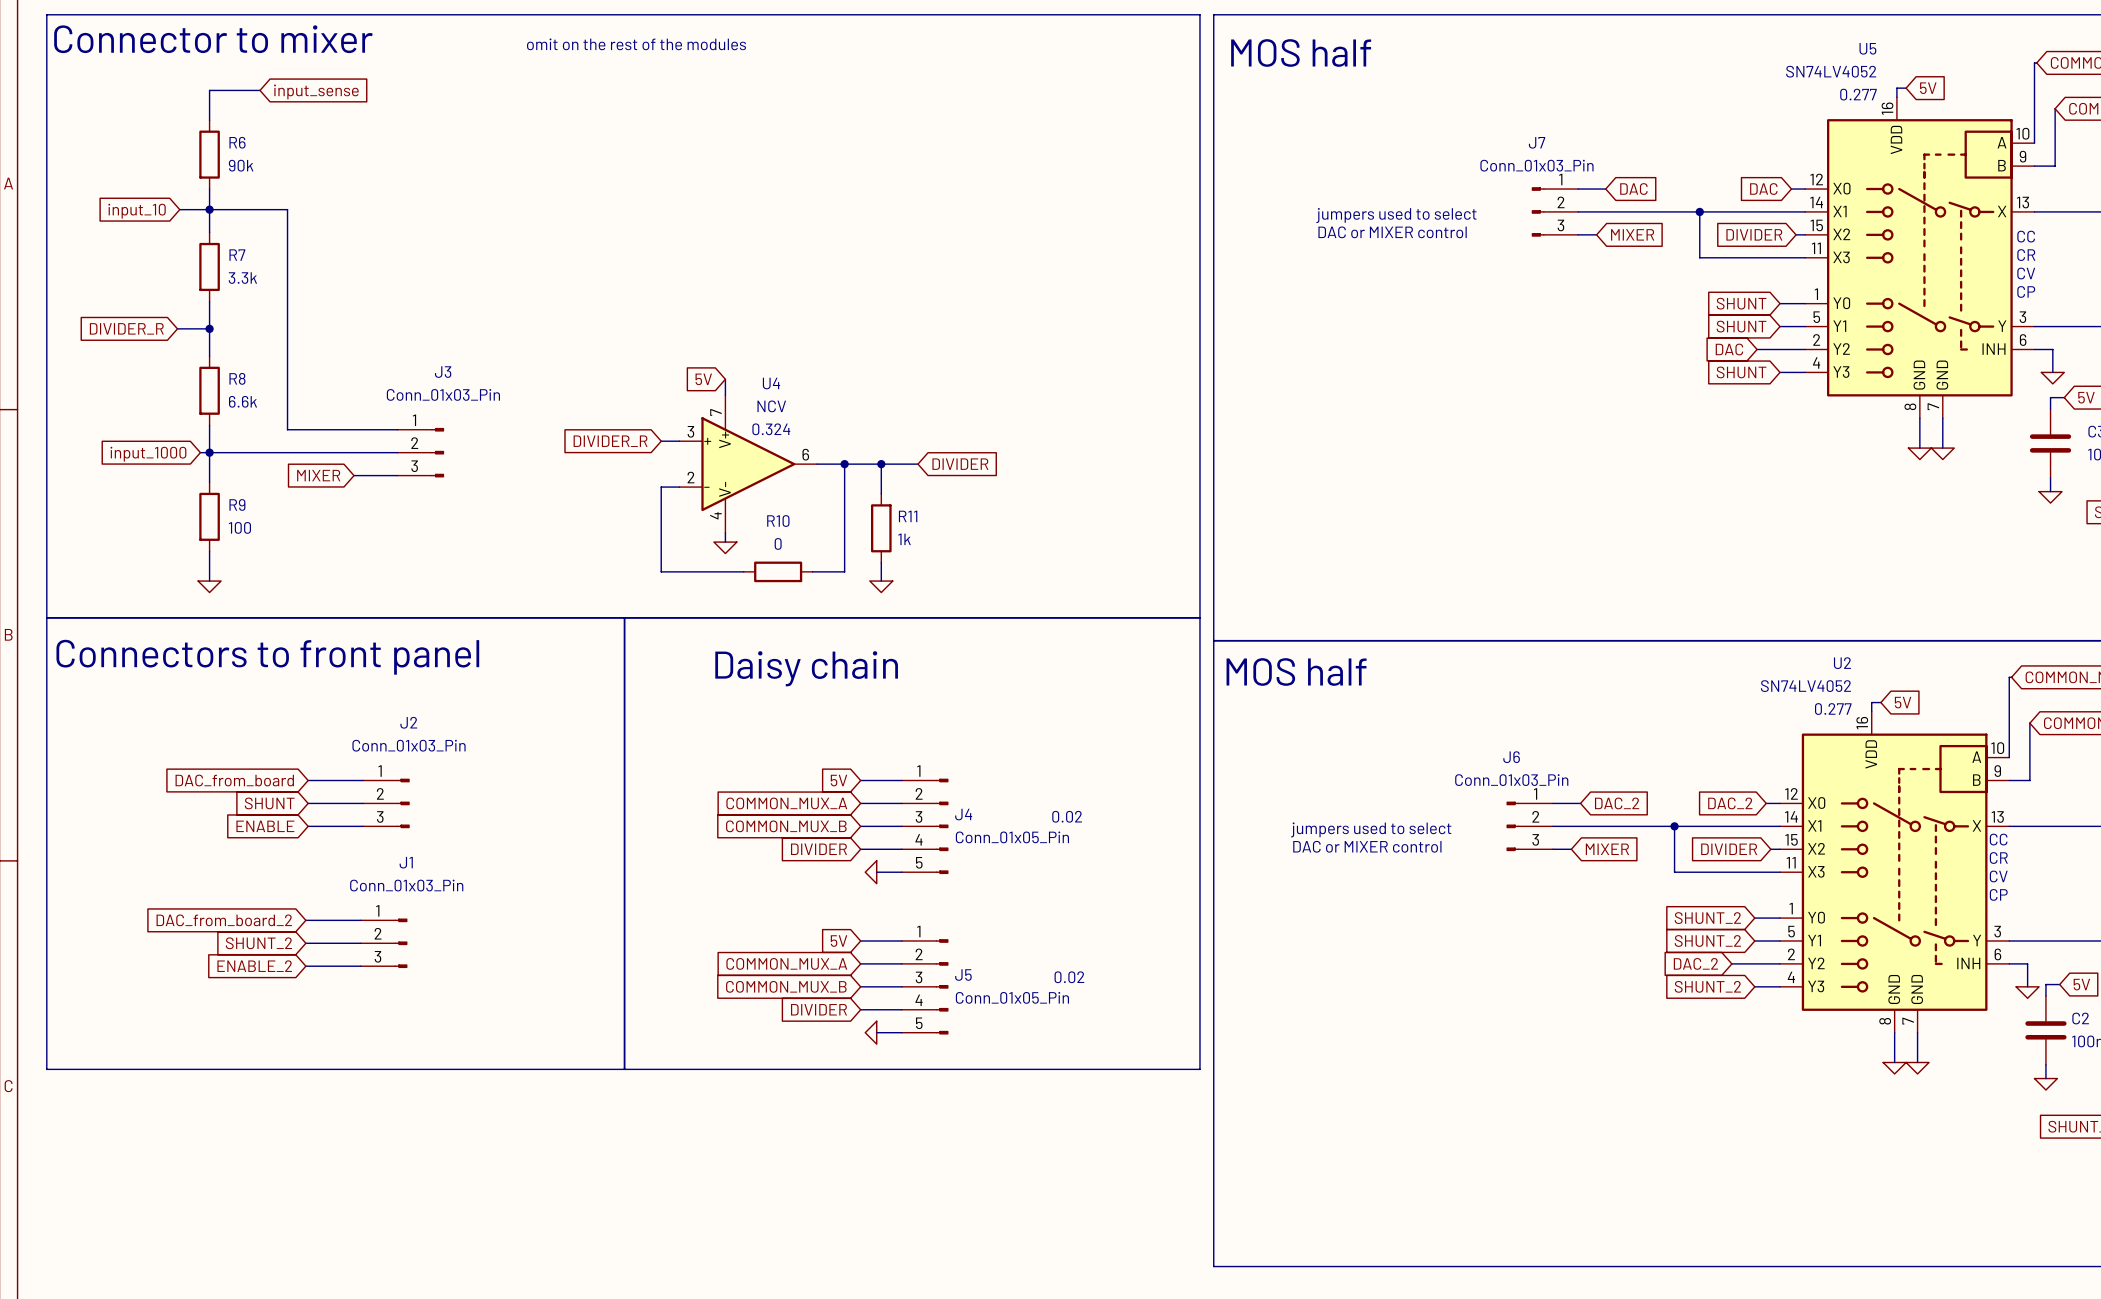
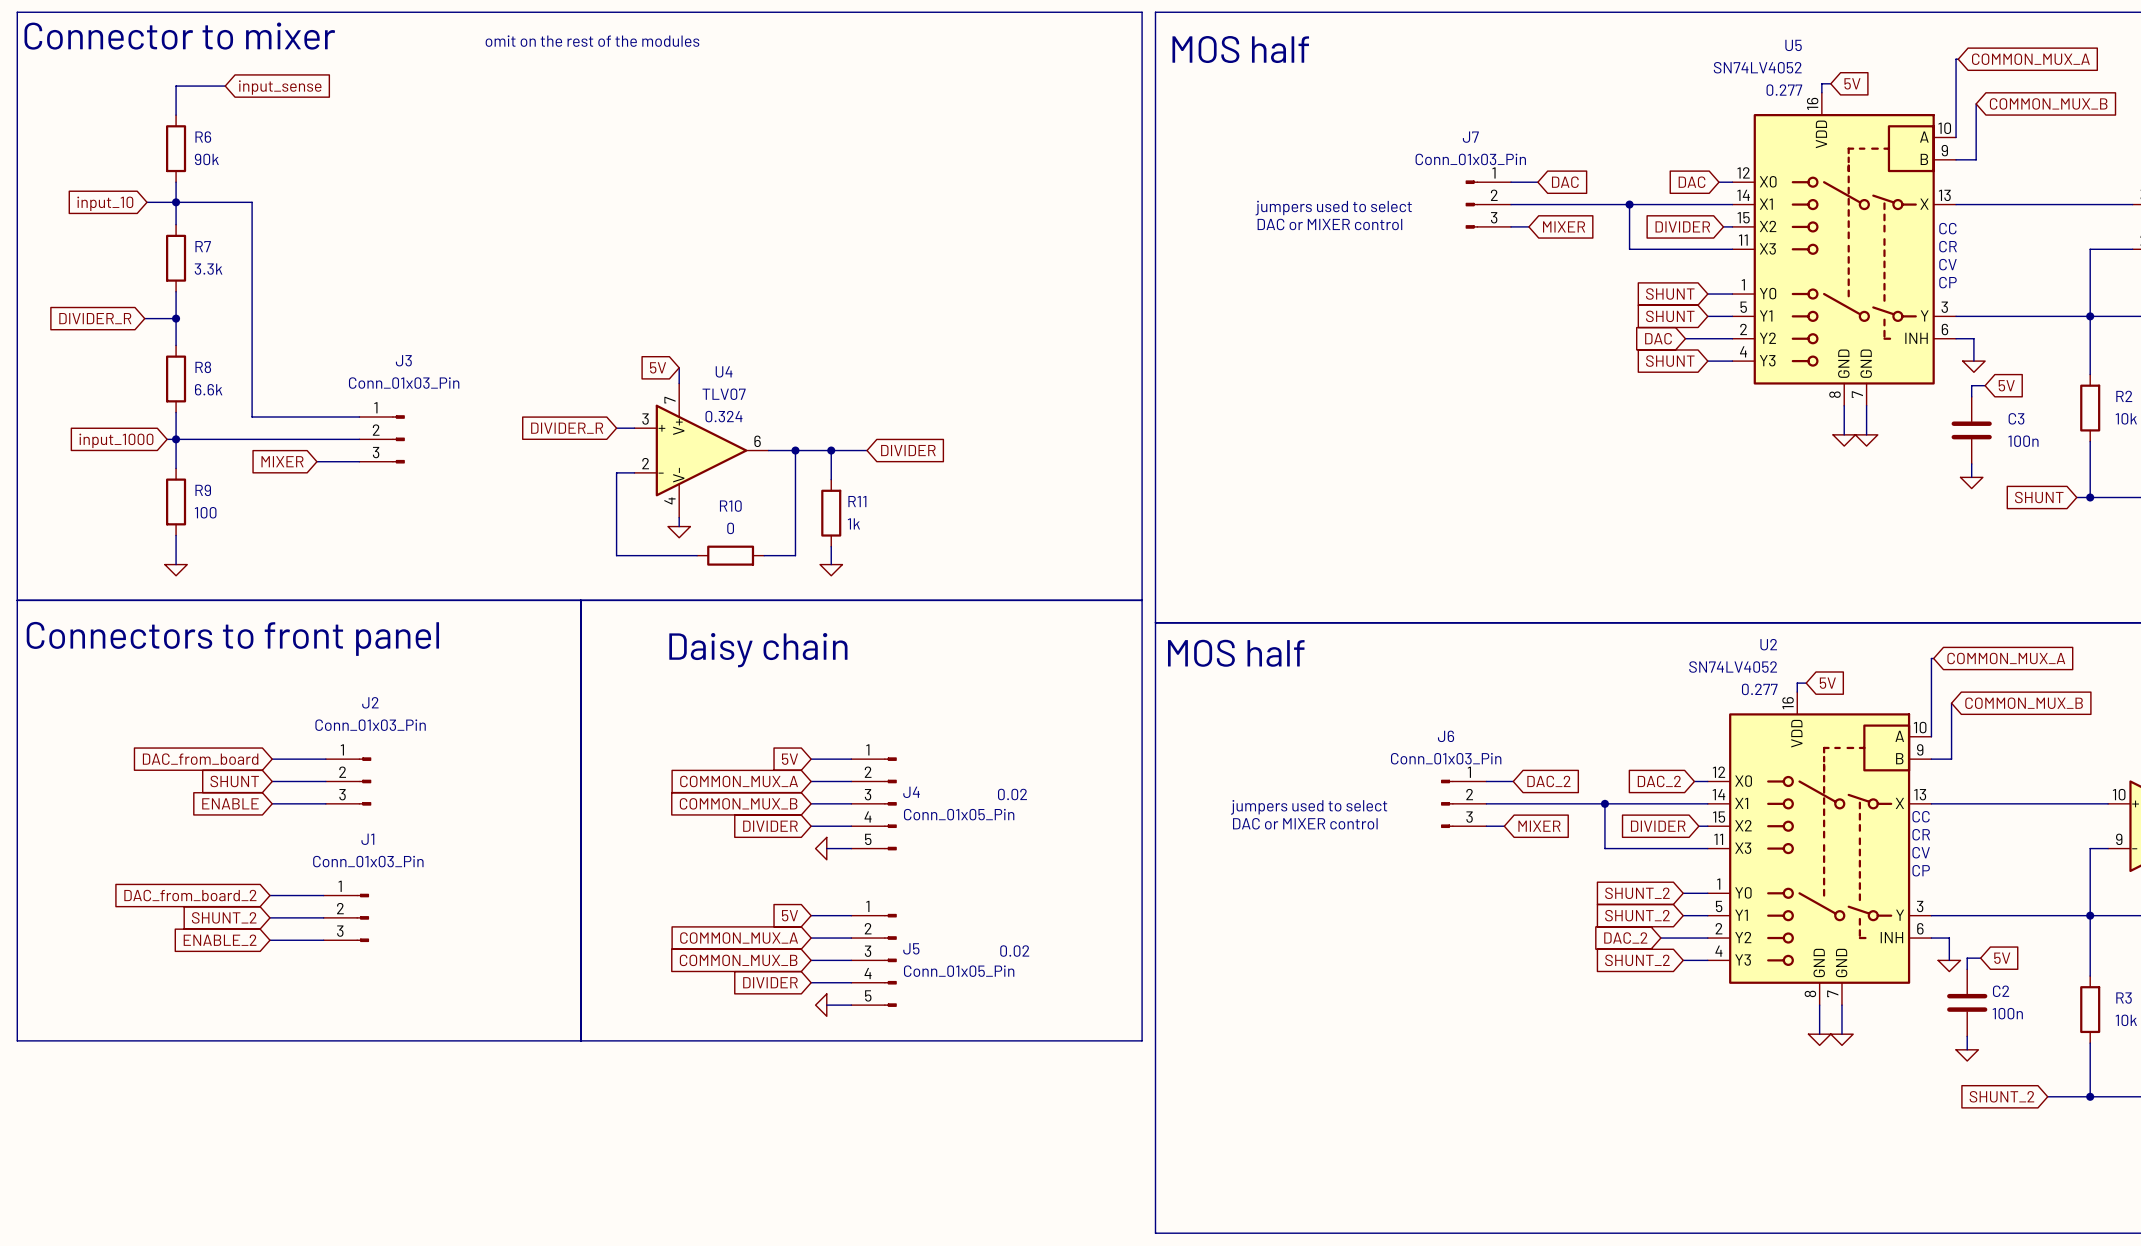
U4 value: NCV (771, 406) -> TLV07 (724, 394)

